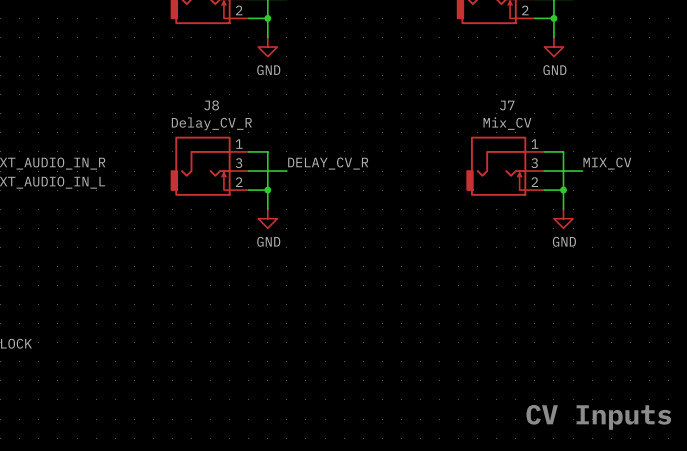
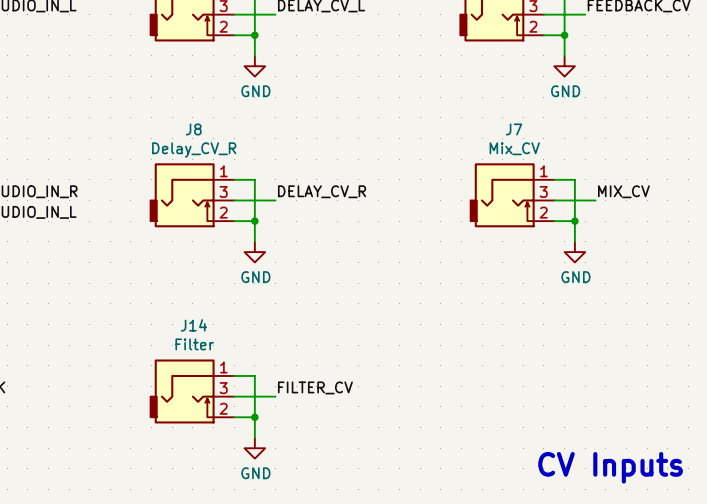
wire: none -> (234, 375) (254, 375) (254, 437)
label: none -> FILTER_CV (315, 387)
J14: none -> Filter (192, 391)
wire: none -> (234, 396) (275, 396)
wire: none -> (234, 417) (254, 417)
junction: none -> (254, 417)
power symbol: none -> GND (254, 448)

